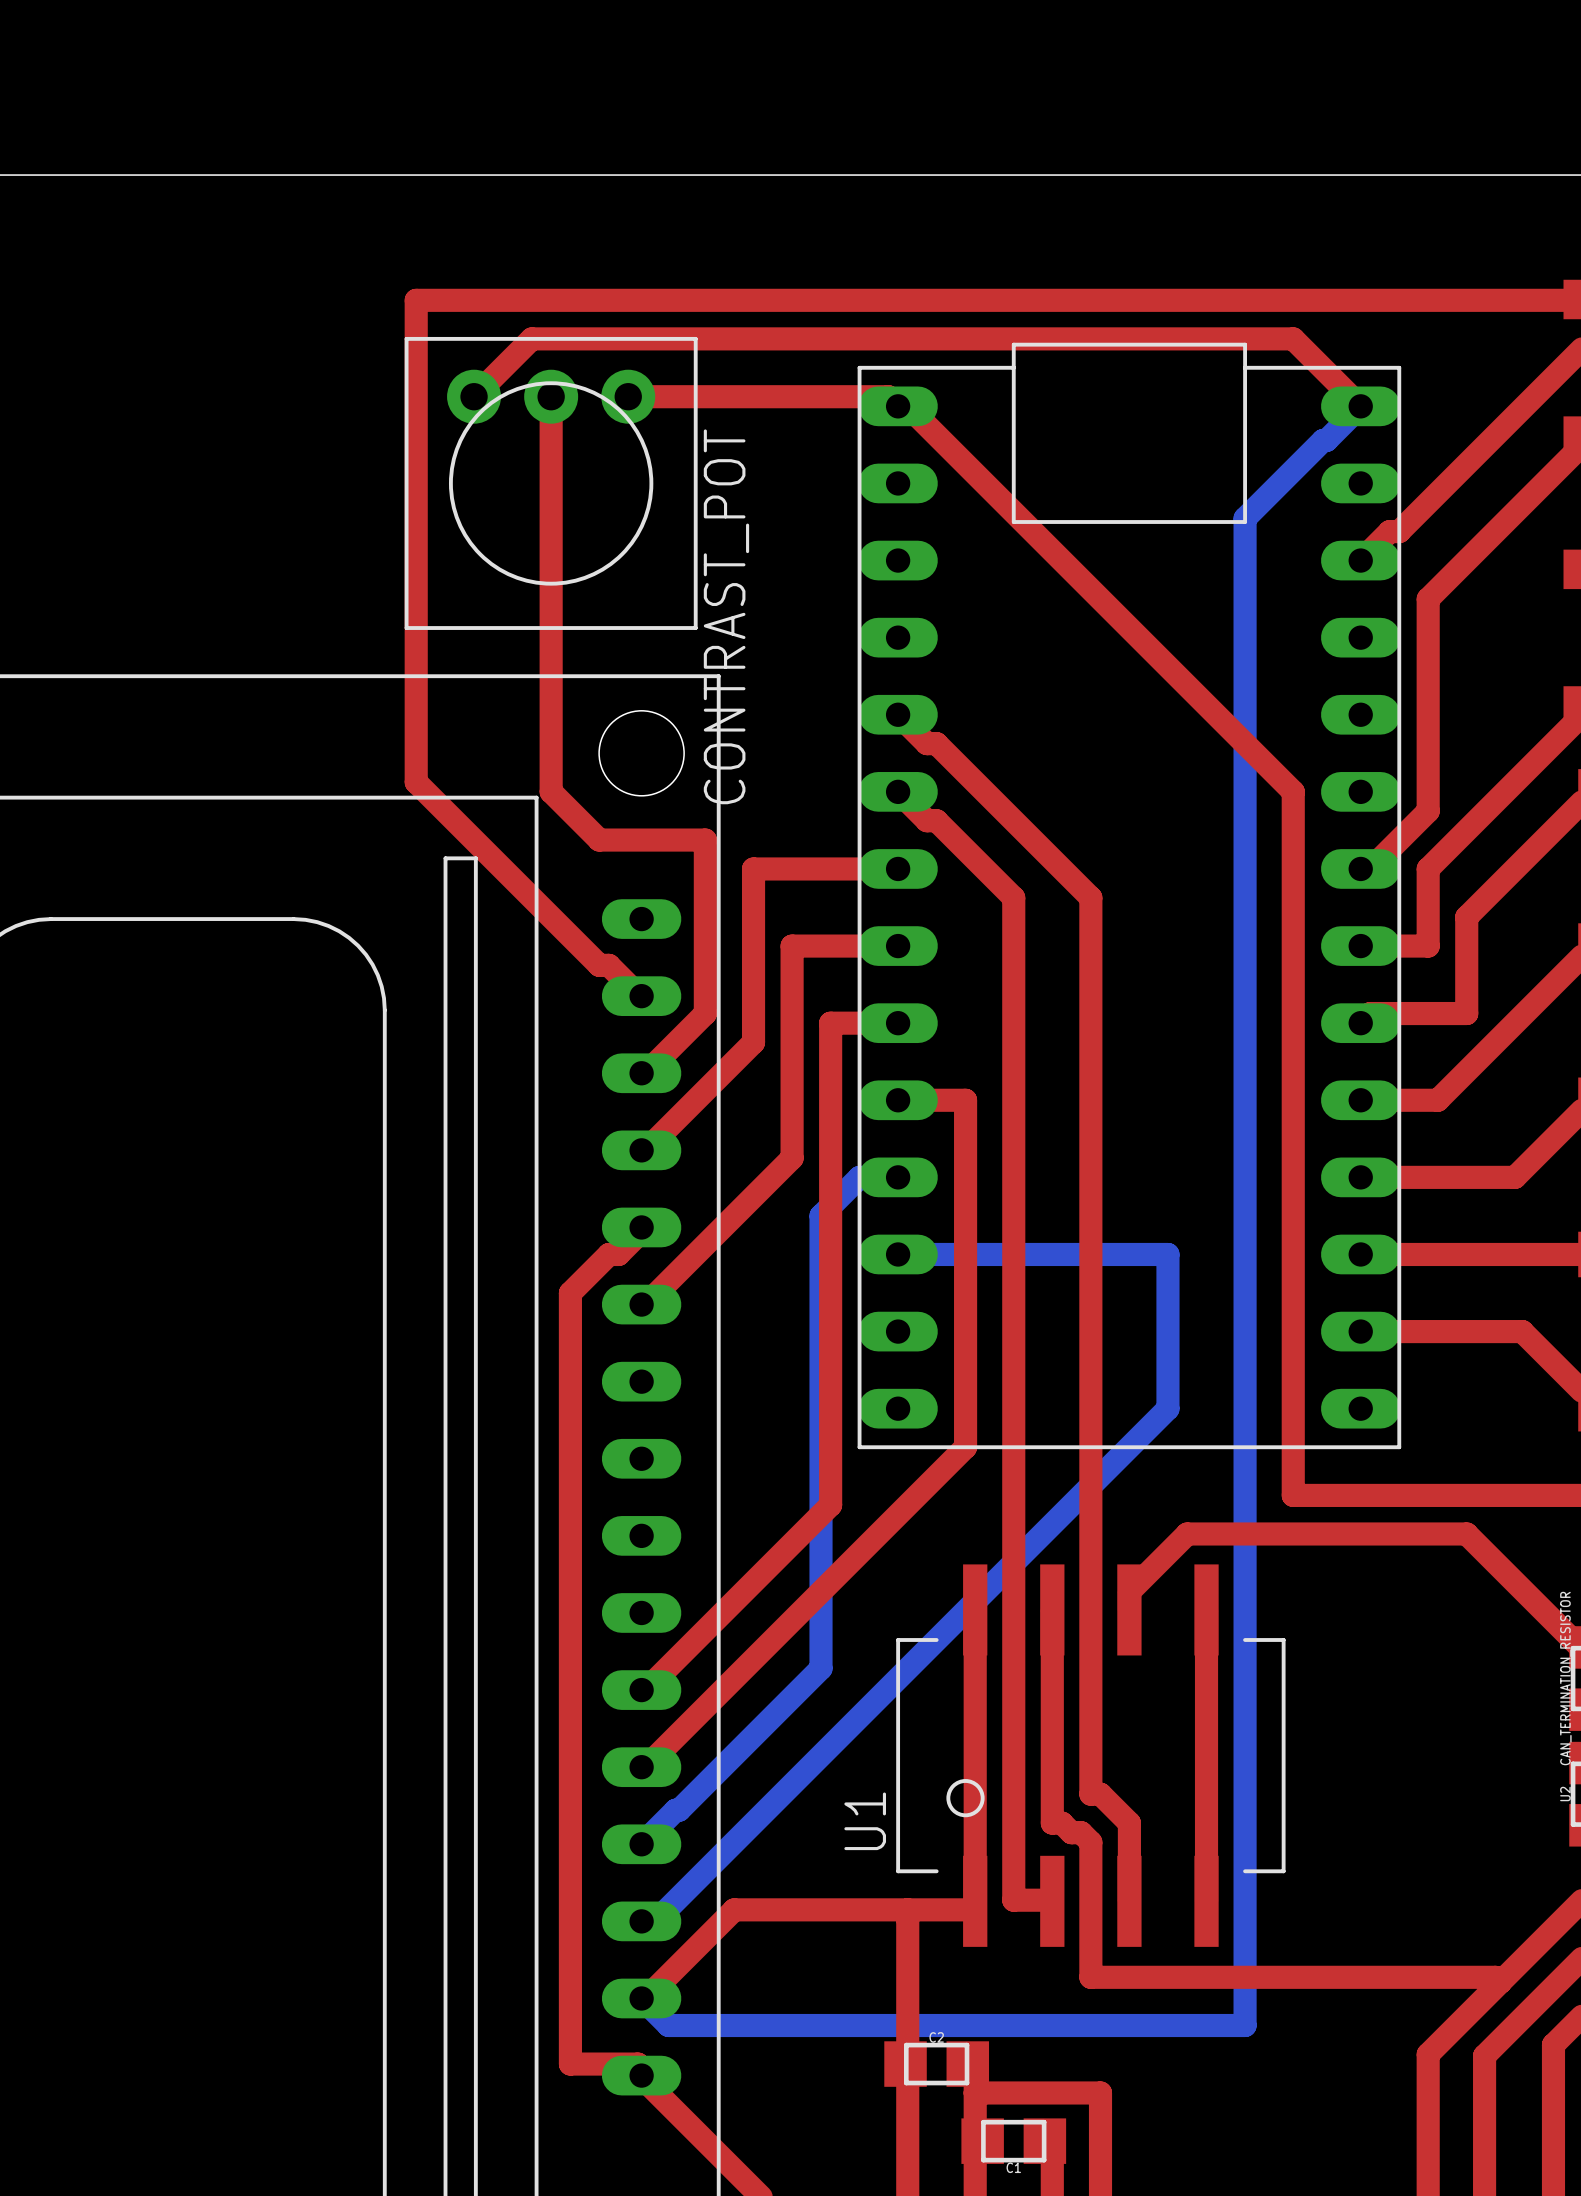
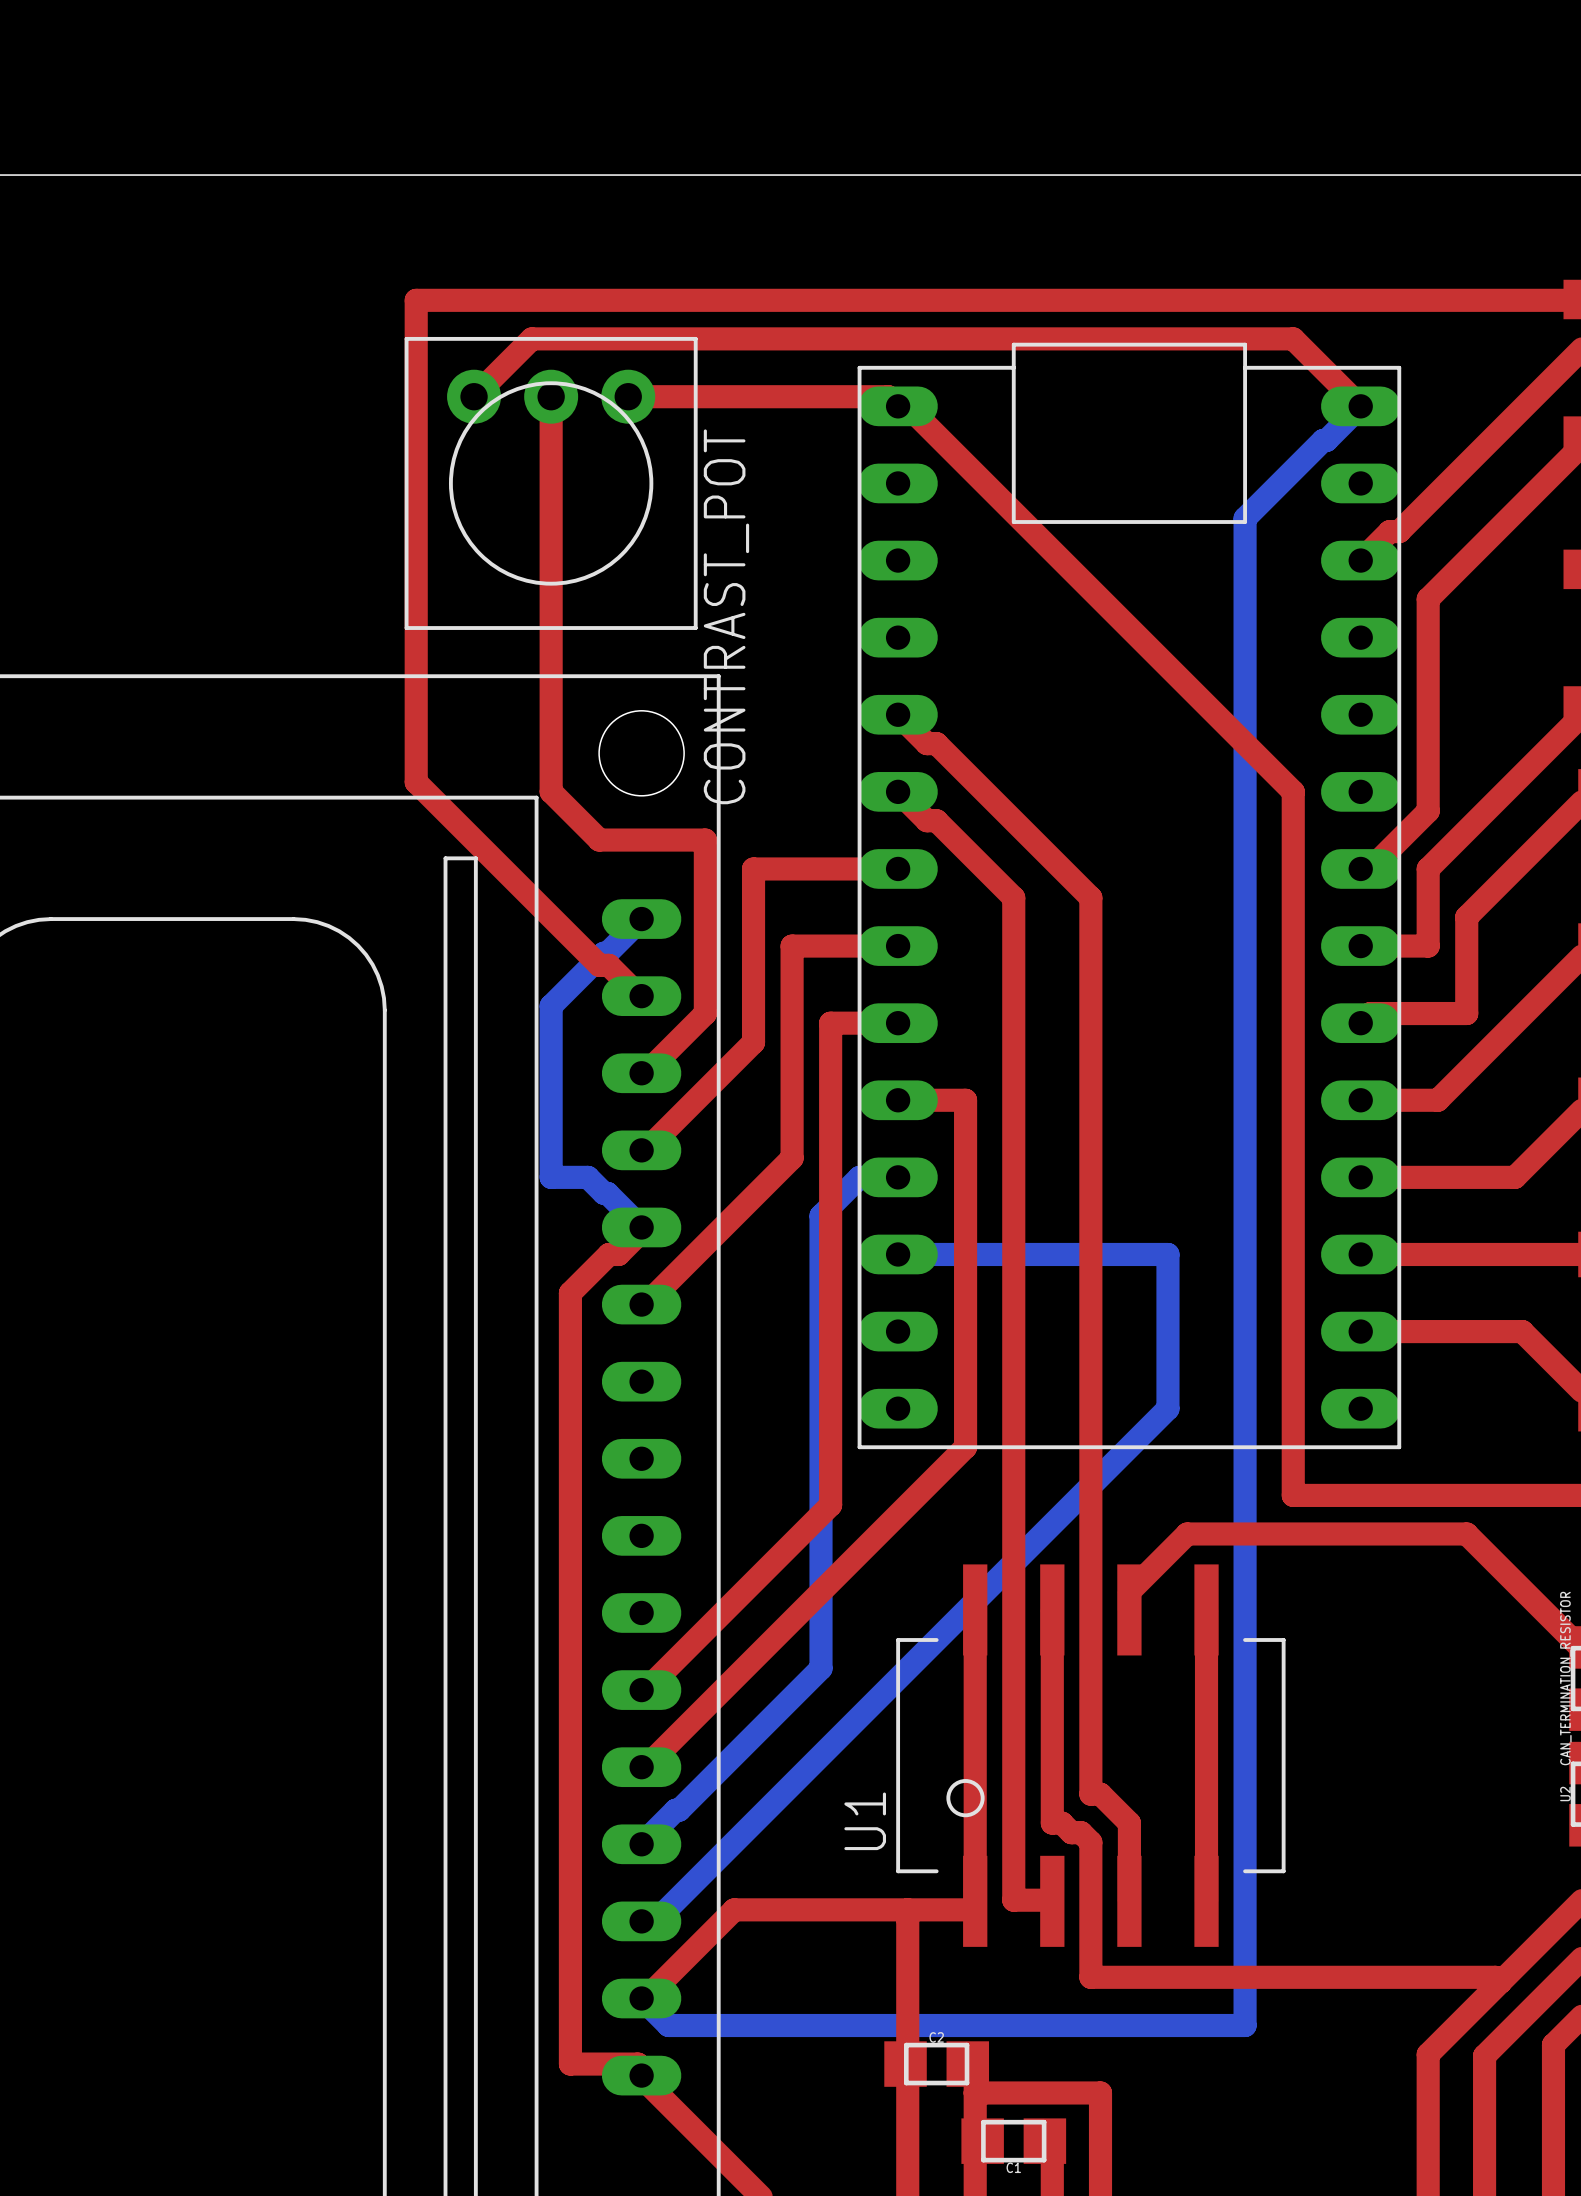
bottom track: none -> (641, 919) (551, 1005) (551, 1177) (587, 1177) (603, 1193) (607, 1193) (641, 1227)

